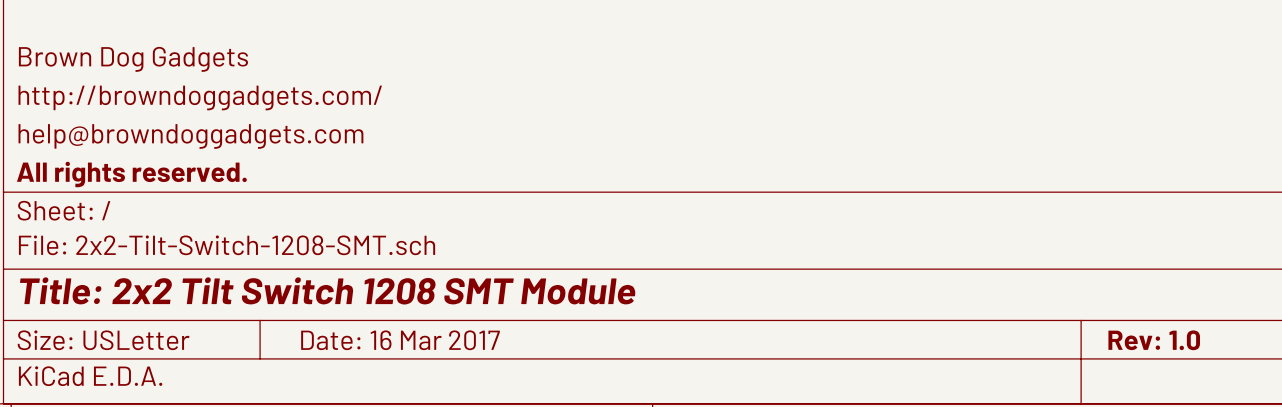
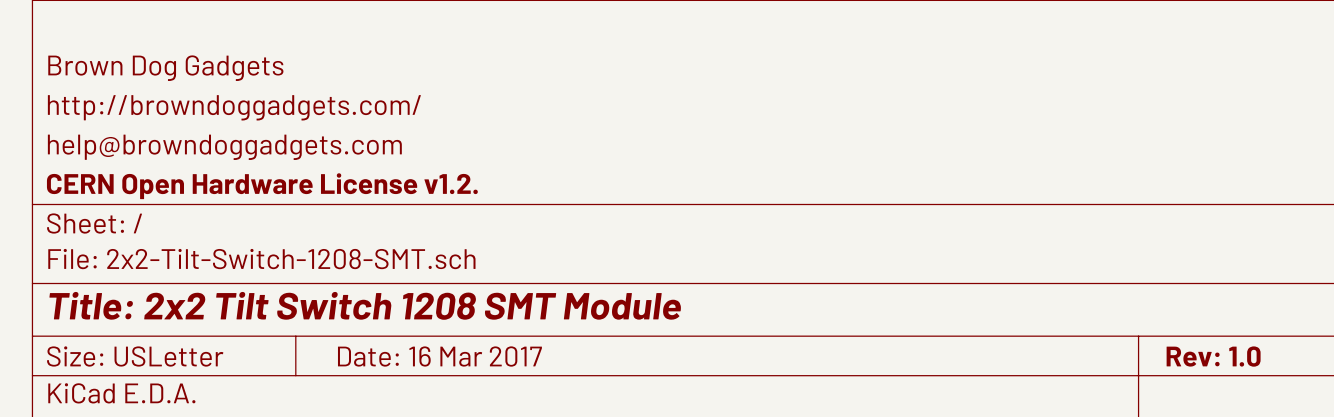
title block: All rights reserved. (131, 174) -> CERN Open Hardware License v1.2. (262, 186)

